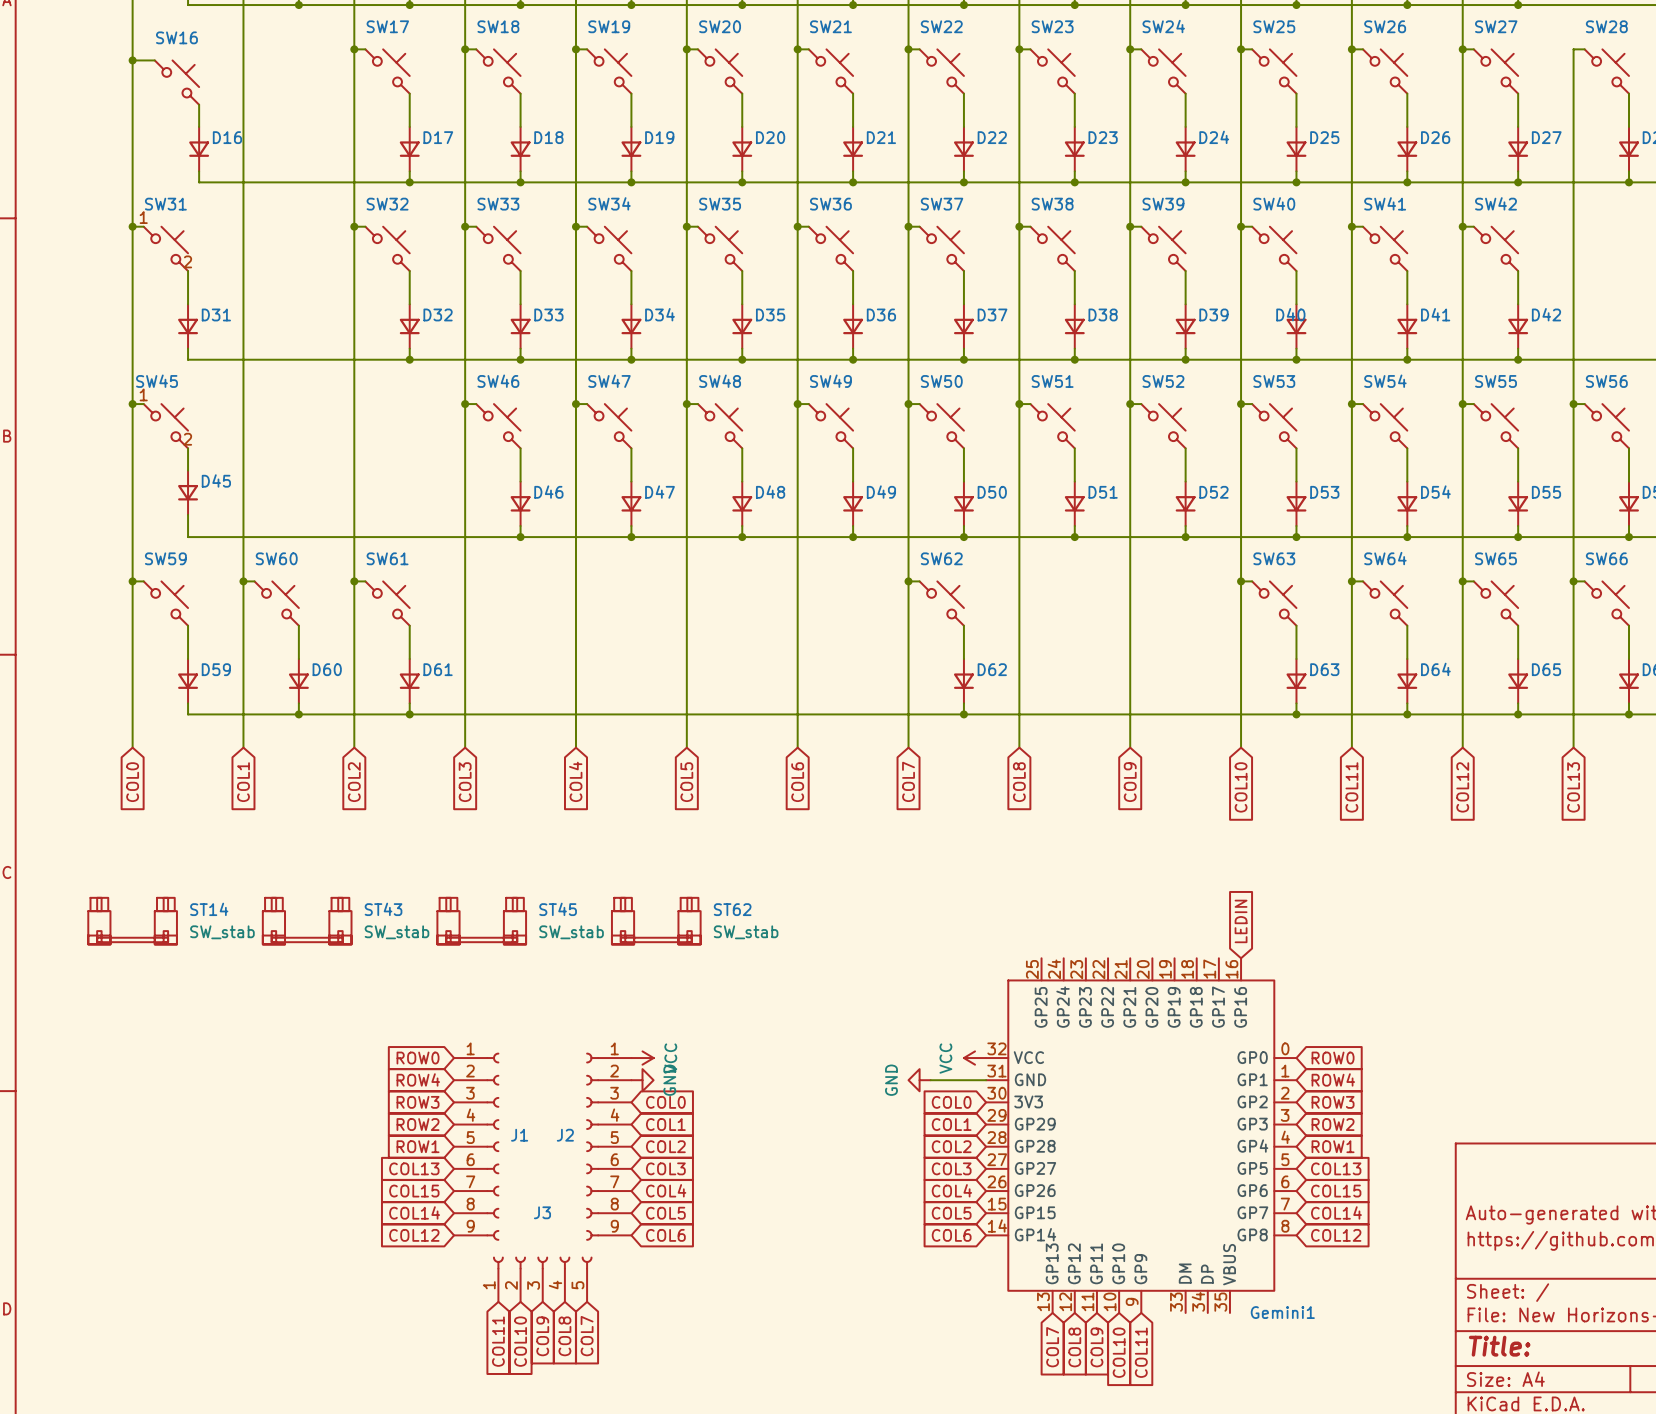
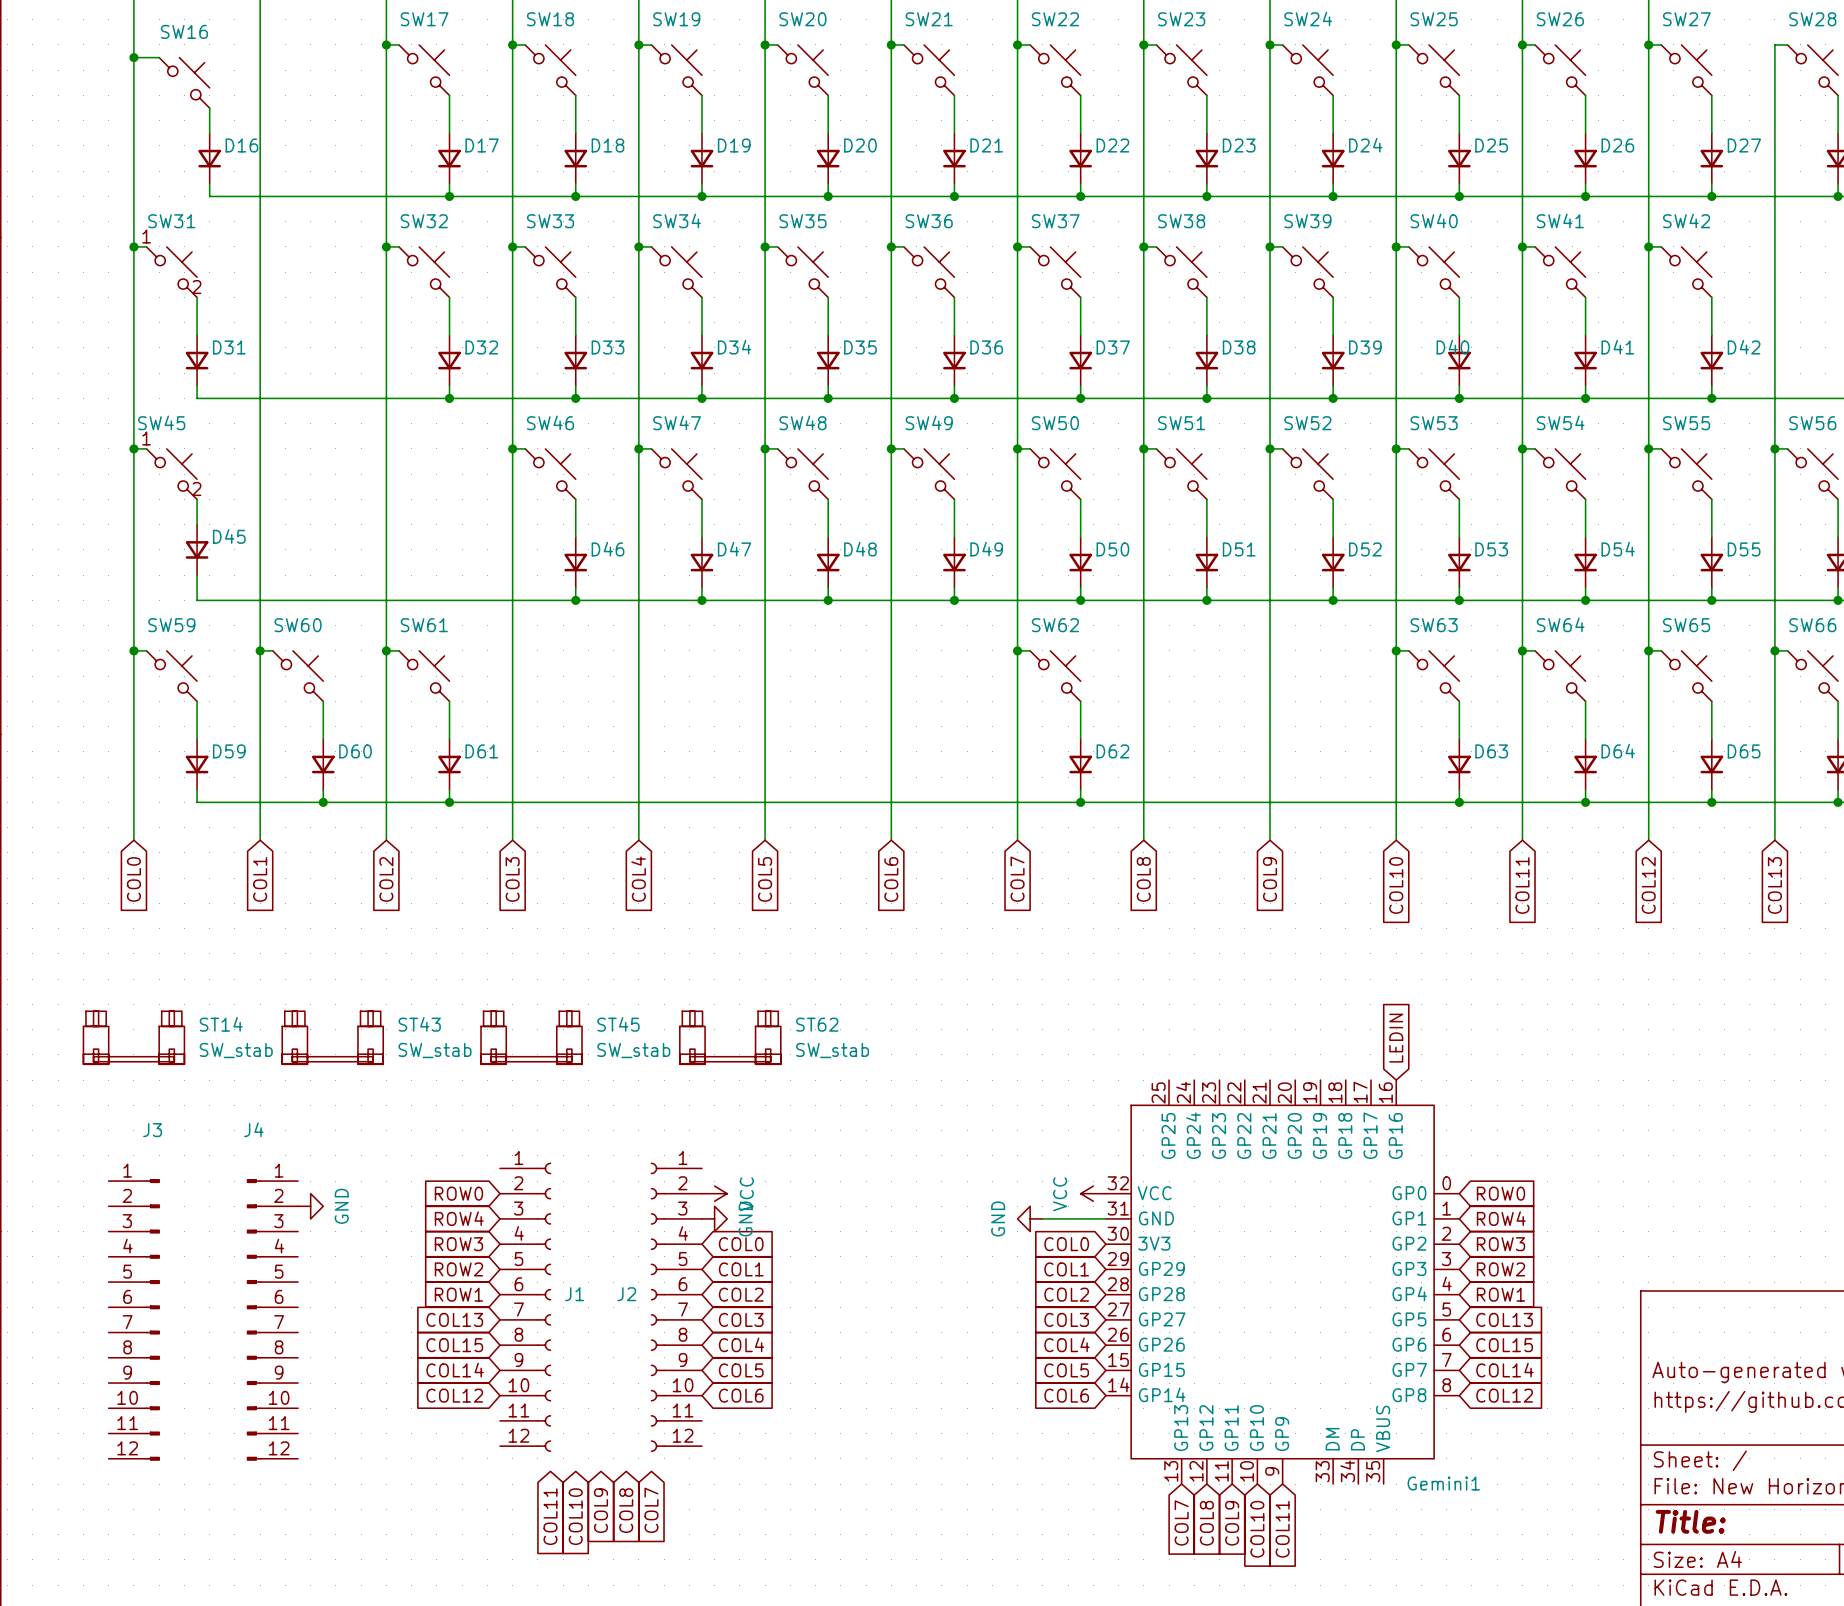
J1 symbol: [454, 1052, 500, 1241] -> [500, 1162, 552, 1452]
J2 symbol: [586, 1052, 632, 1241] -> [650, 1162, 702, 1452]
power symbol: none -> GND (310, 1206)
J4: none -> (272, 1319)
J3 name position: J3 (542, 1212) -> J3 (152, 1130)
J3 symbol: [493, 1256, 593, 1302] -> [108, 1179, 160, 1461]

